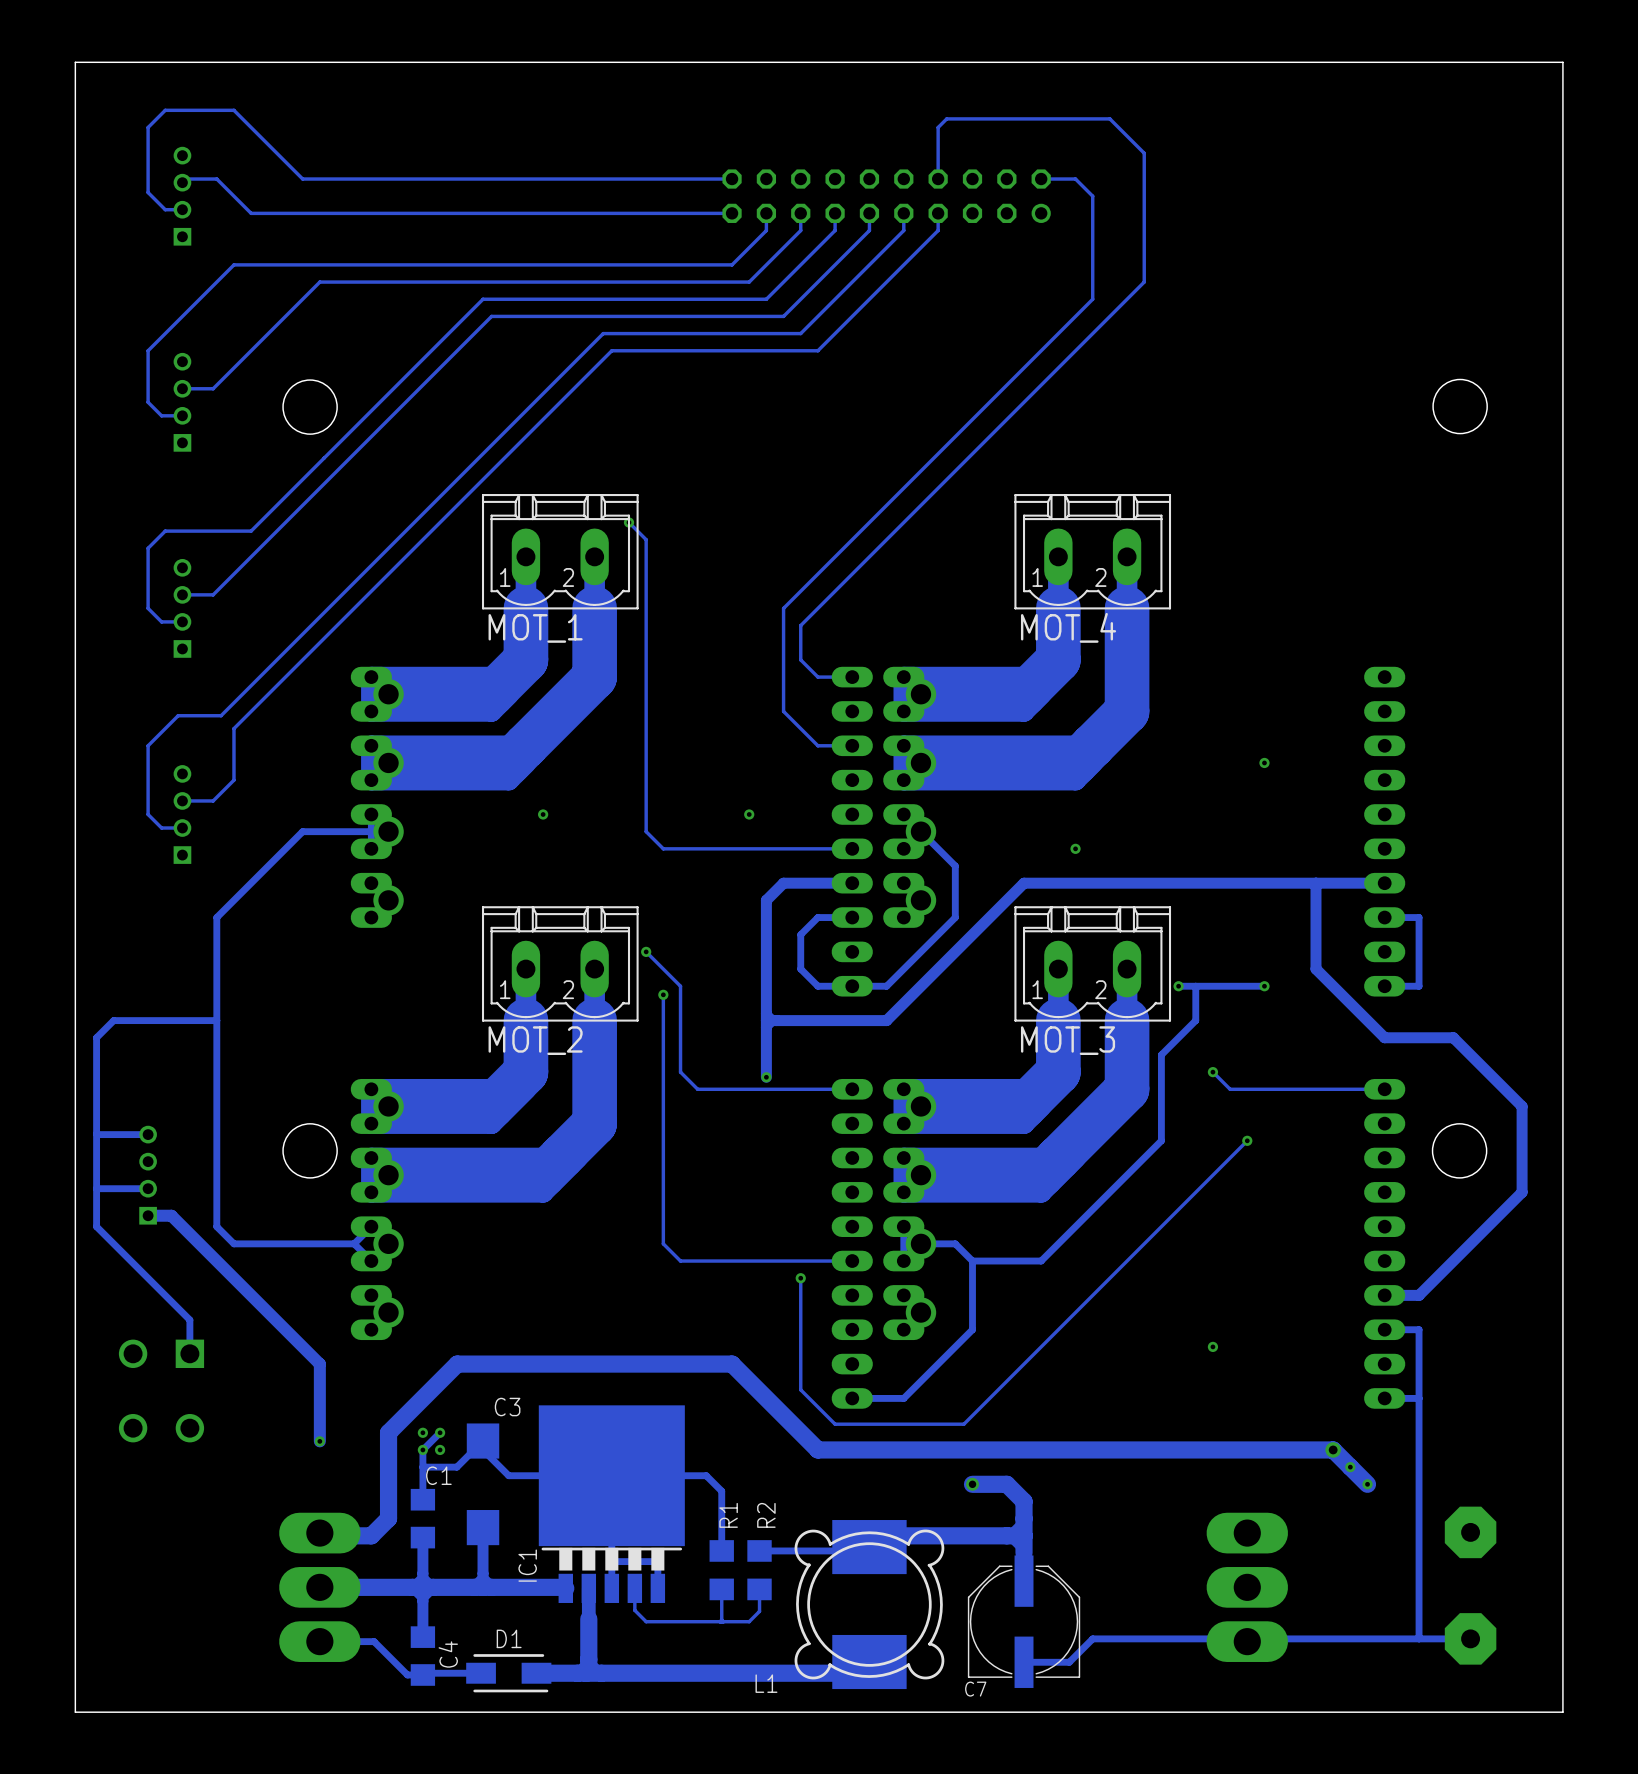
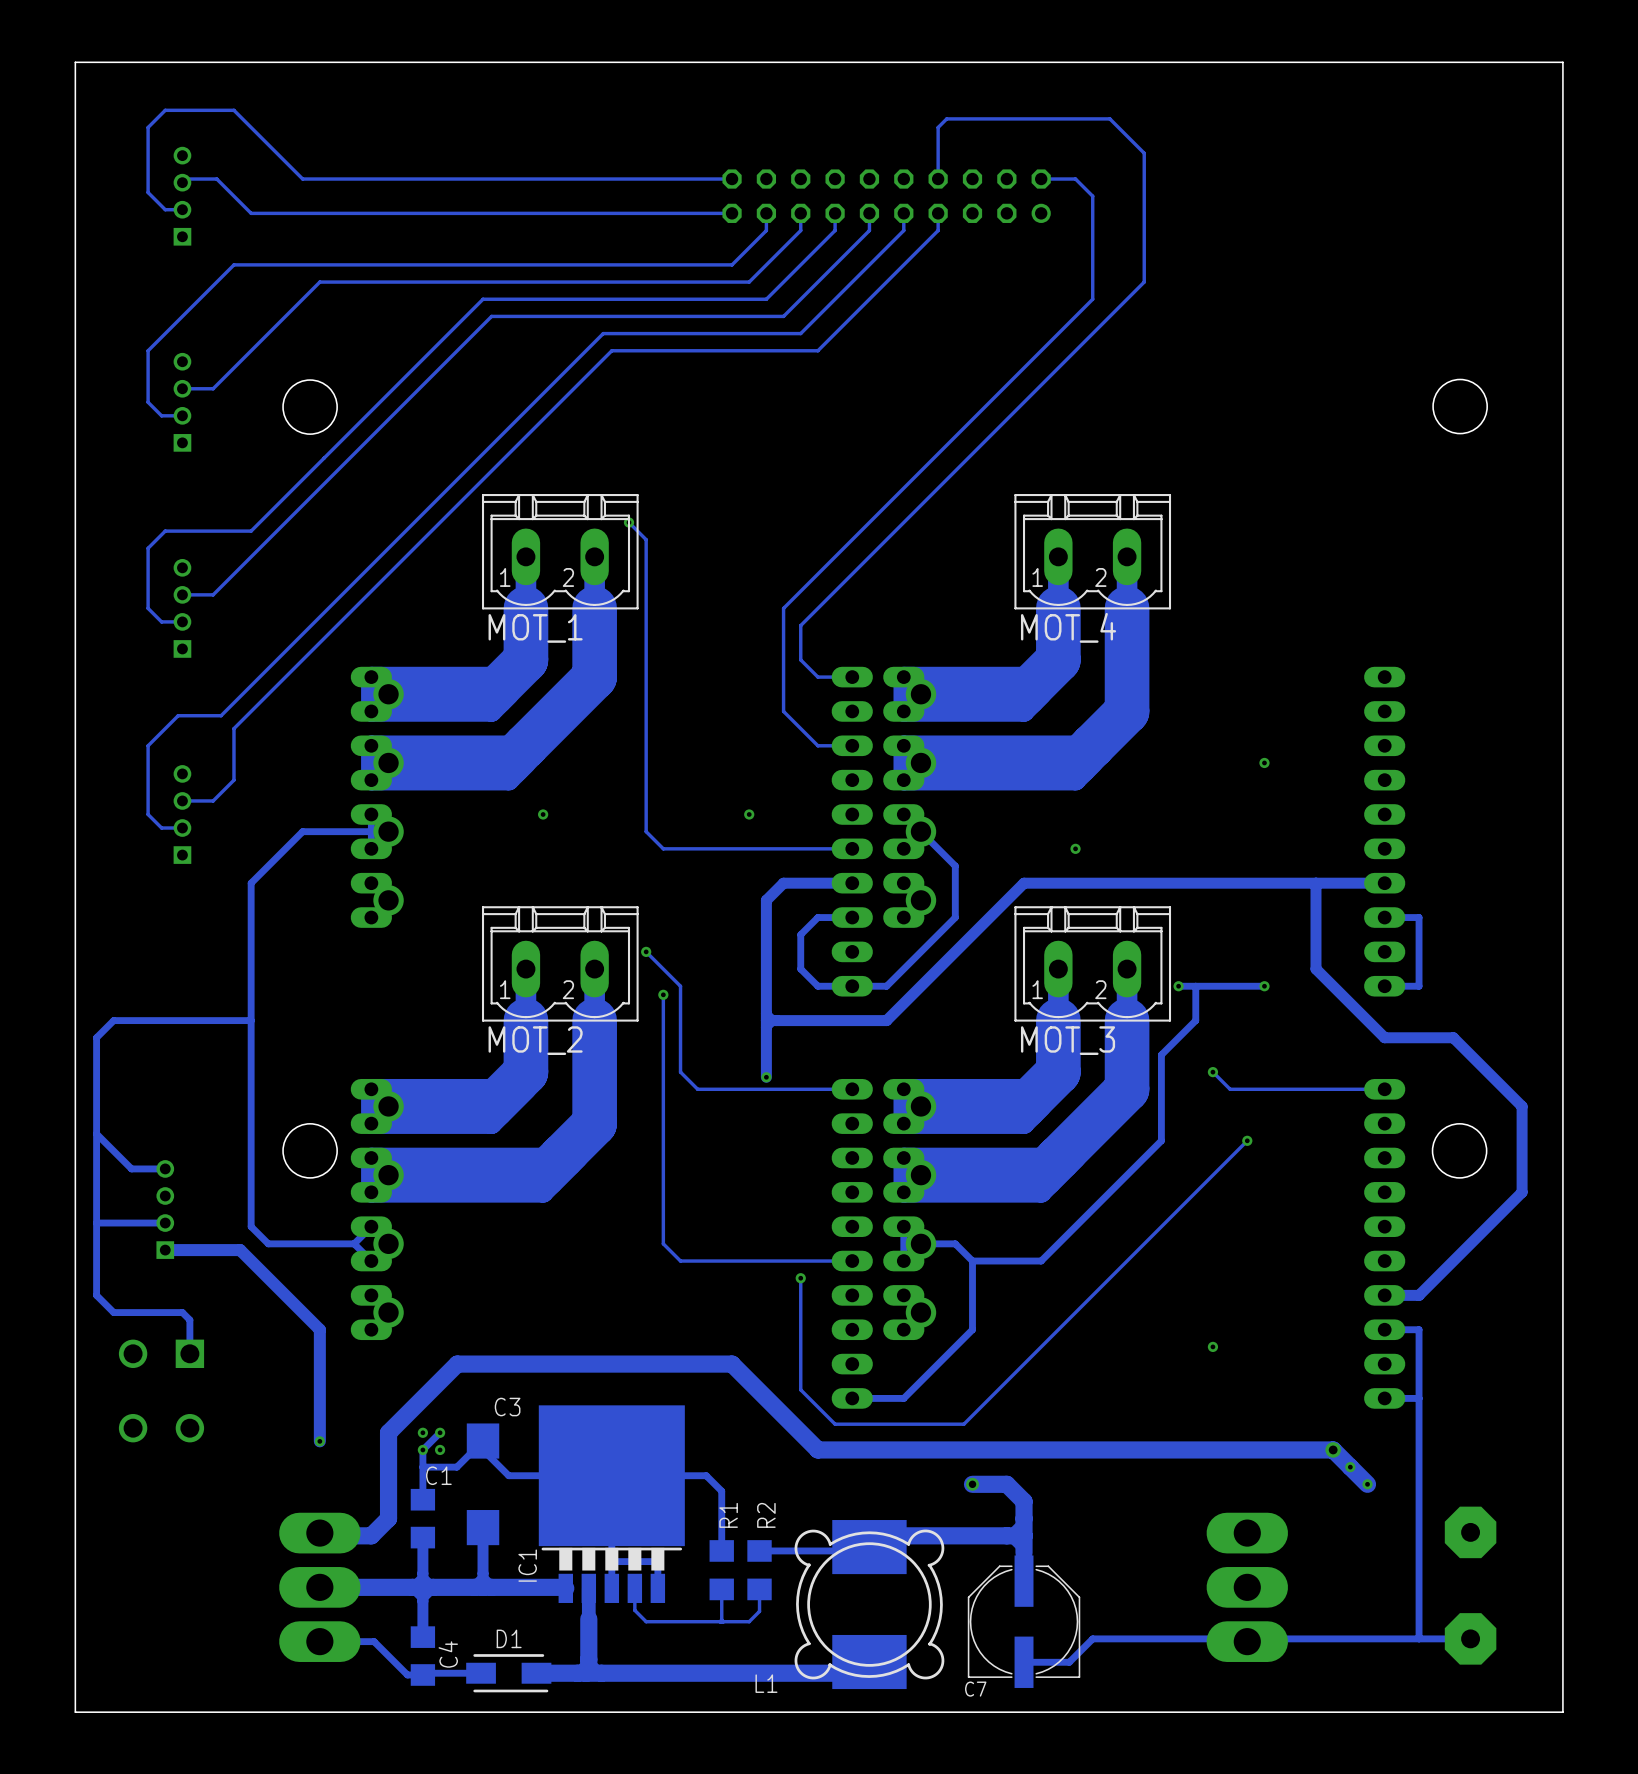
track: (251, 883) (216, 917) (216, 1226) (233, 1243) (268, 1243) -> (251, 883) (251, 1226) (268, 1243)
track: none -> (251, 1020) (216, 1020)
track: (148, 1134) (97, 1134) -> (165, 1168) (131, 1168) (97, 1134)
part position: (148, 1175) -> (165, 1209)
track: (148, 1188) (96, 1188) -> none
track: (148, 1215) (171, 1215) (319, 1364) -> (165, 1250) (240, 1250) (319, 1329) (319, 1364)
track: none -> (165, 1223) (96, 1223)
track: (96, 1226) (182, 1312) -> (96, 1226) (96, 1295) (113, 1312) (182, 1312)

